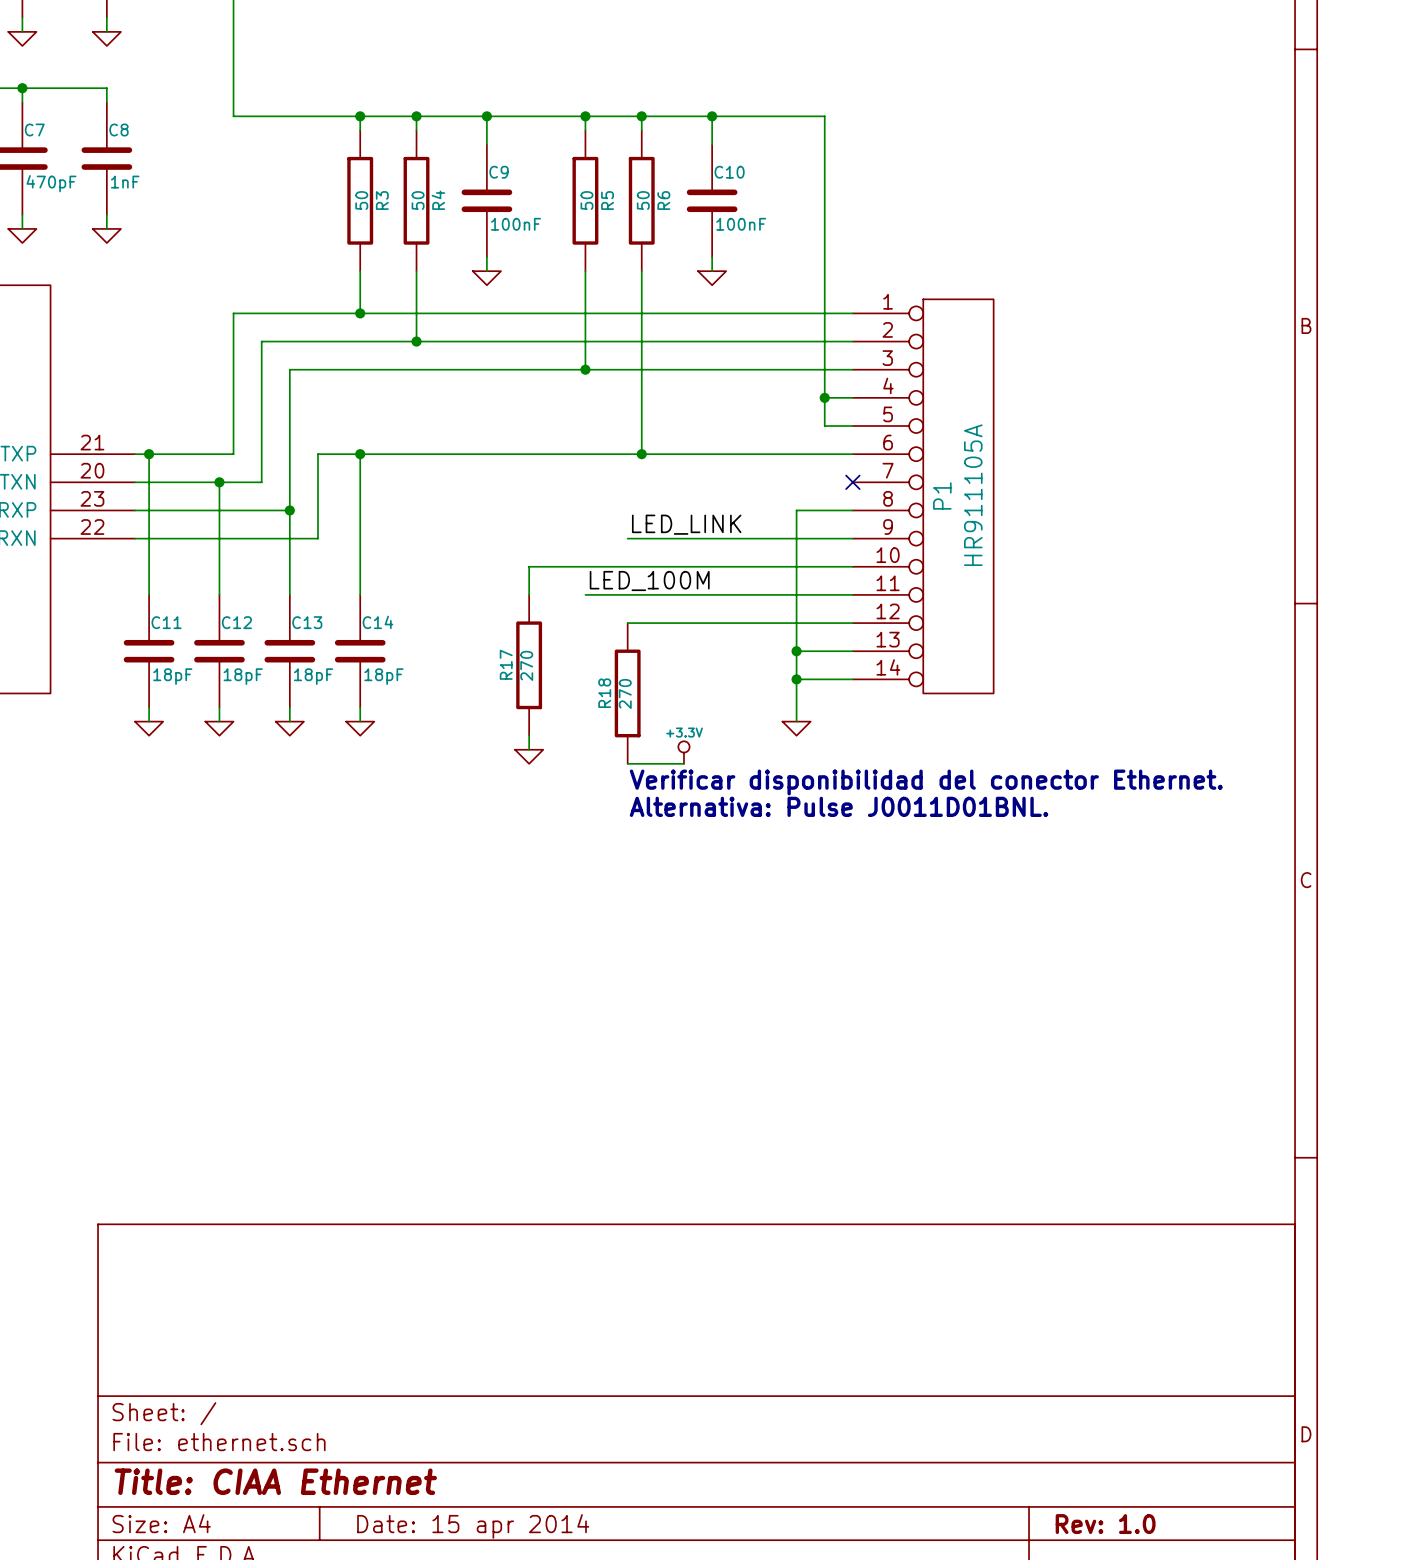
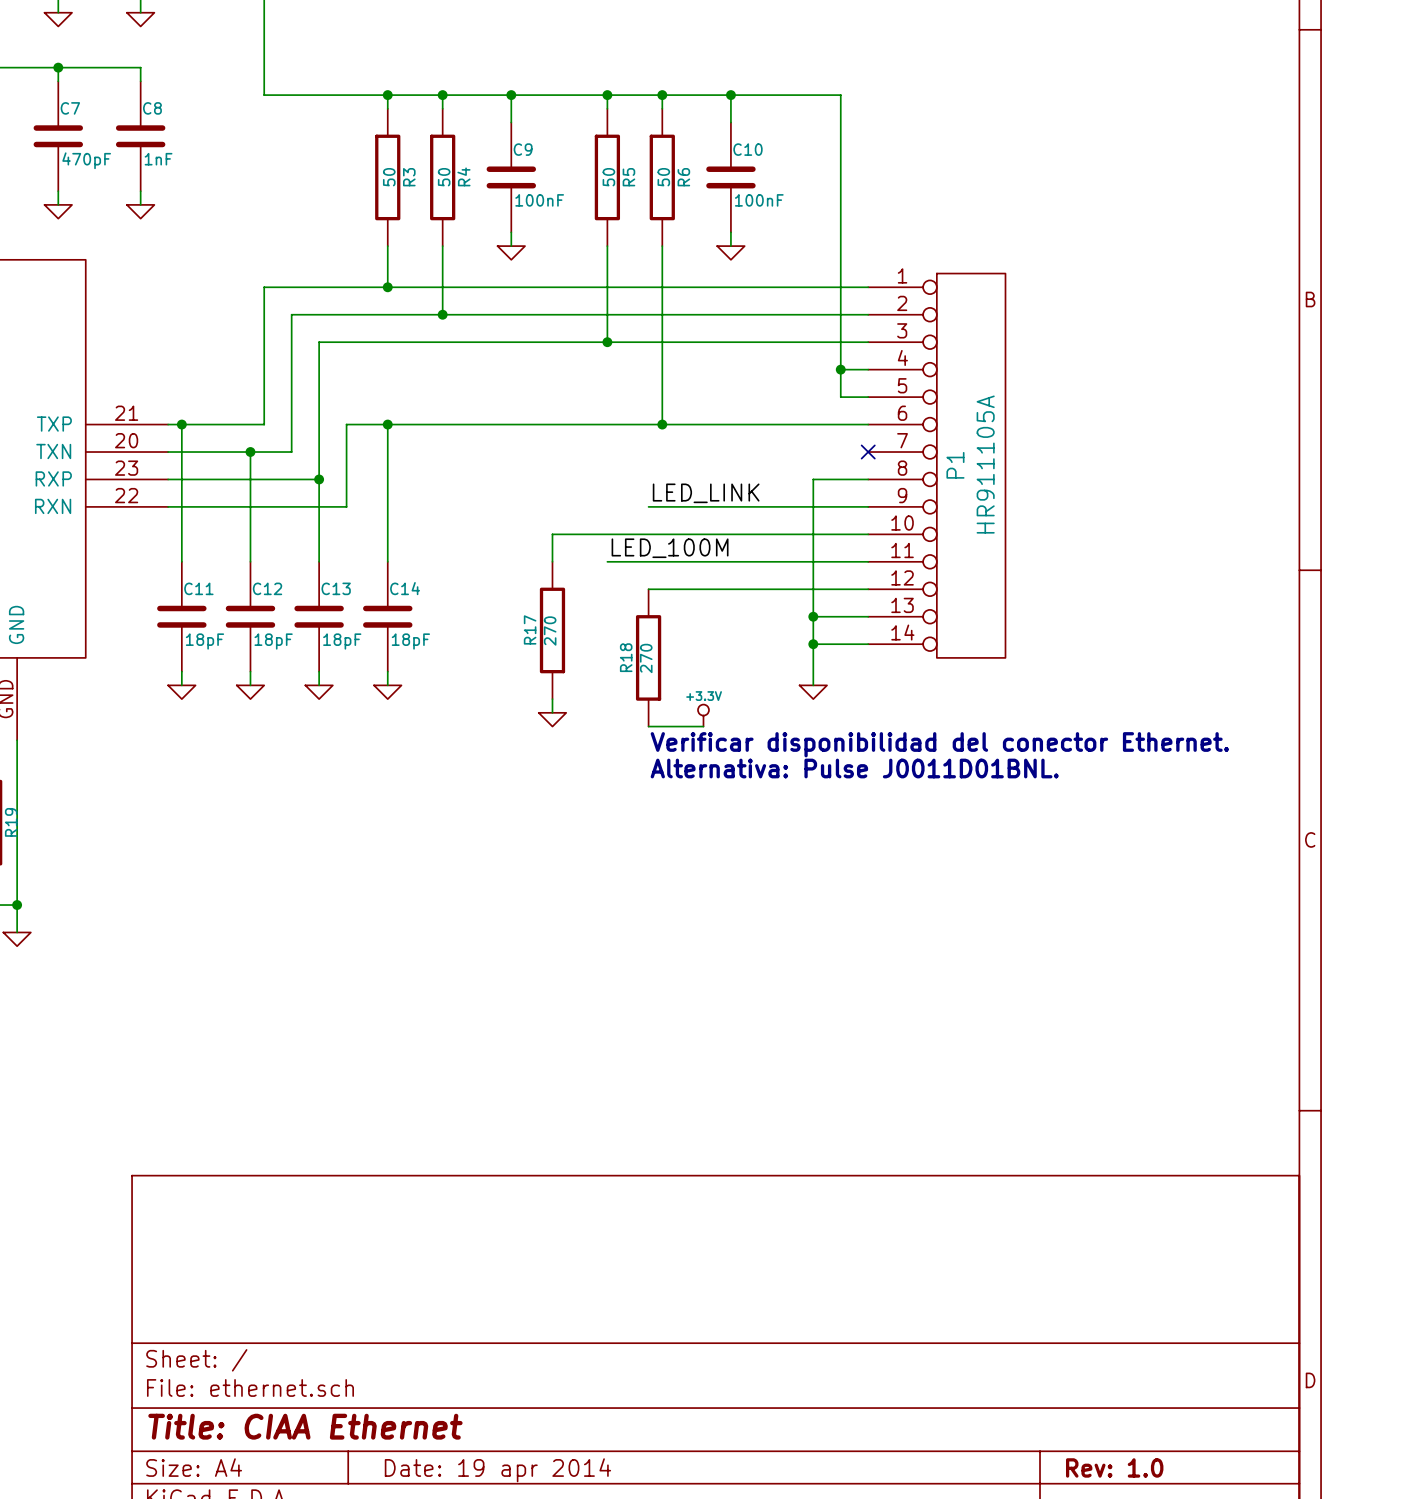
title block: Date: 15 apr 2014 (473, 1526) -> Date: 19 apr 2014 (497, 1470)

